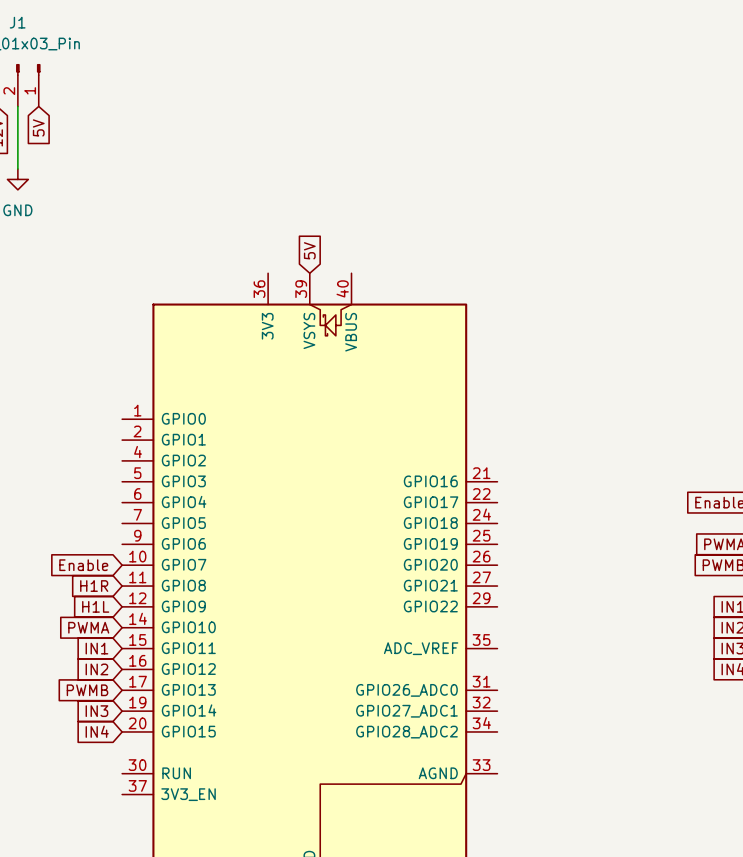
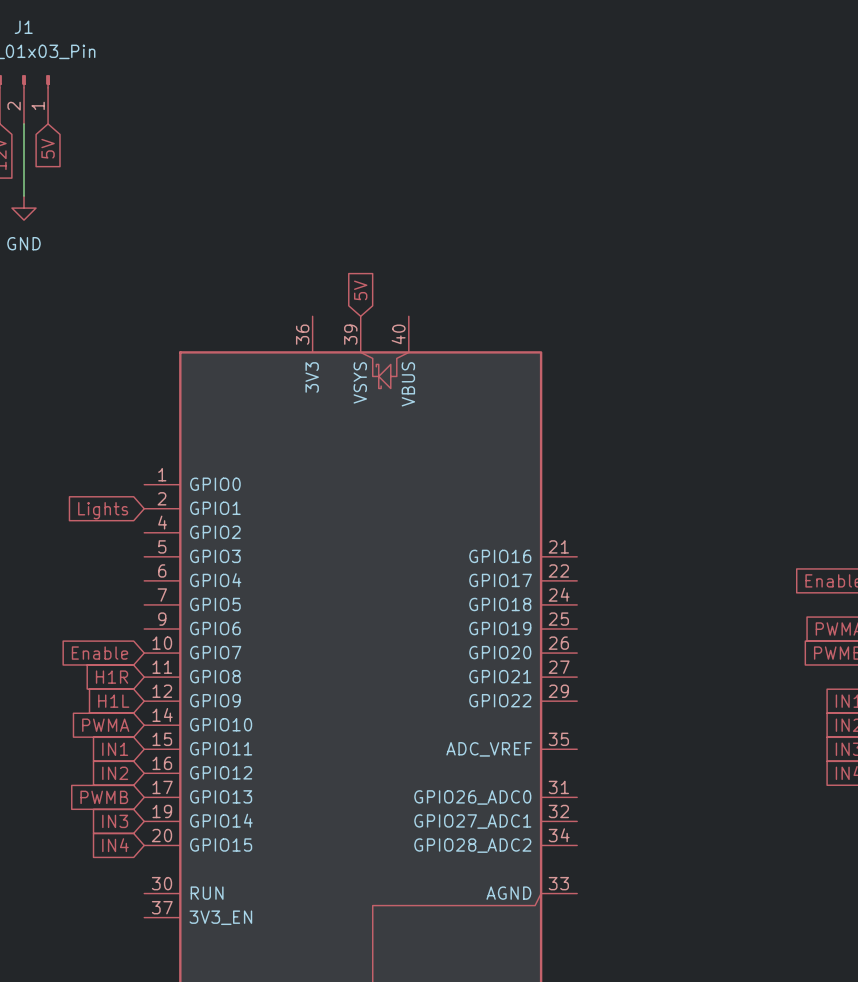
global label: none -> Lights (103, 510)

